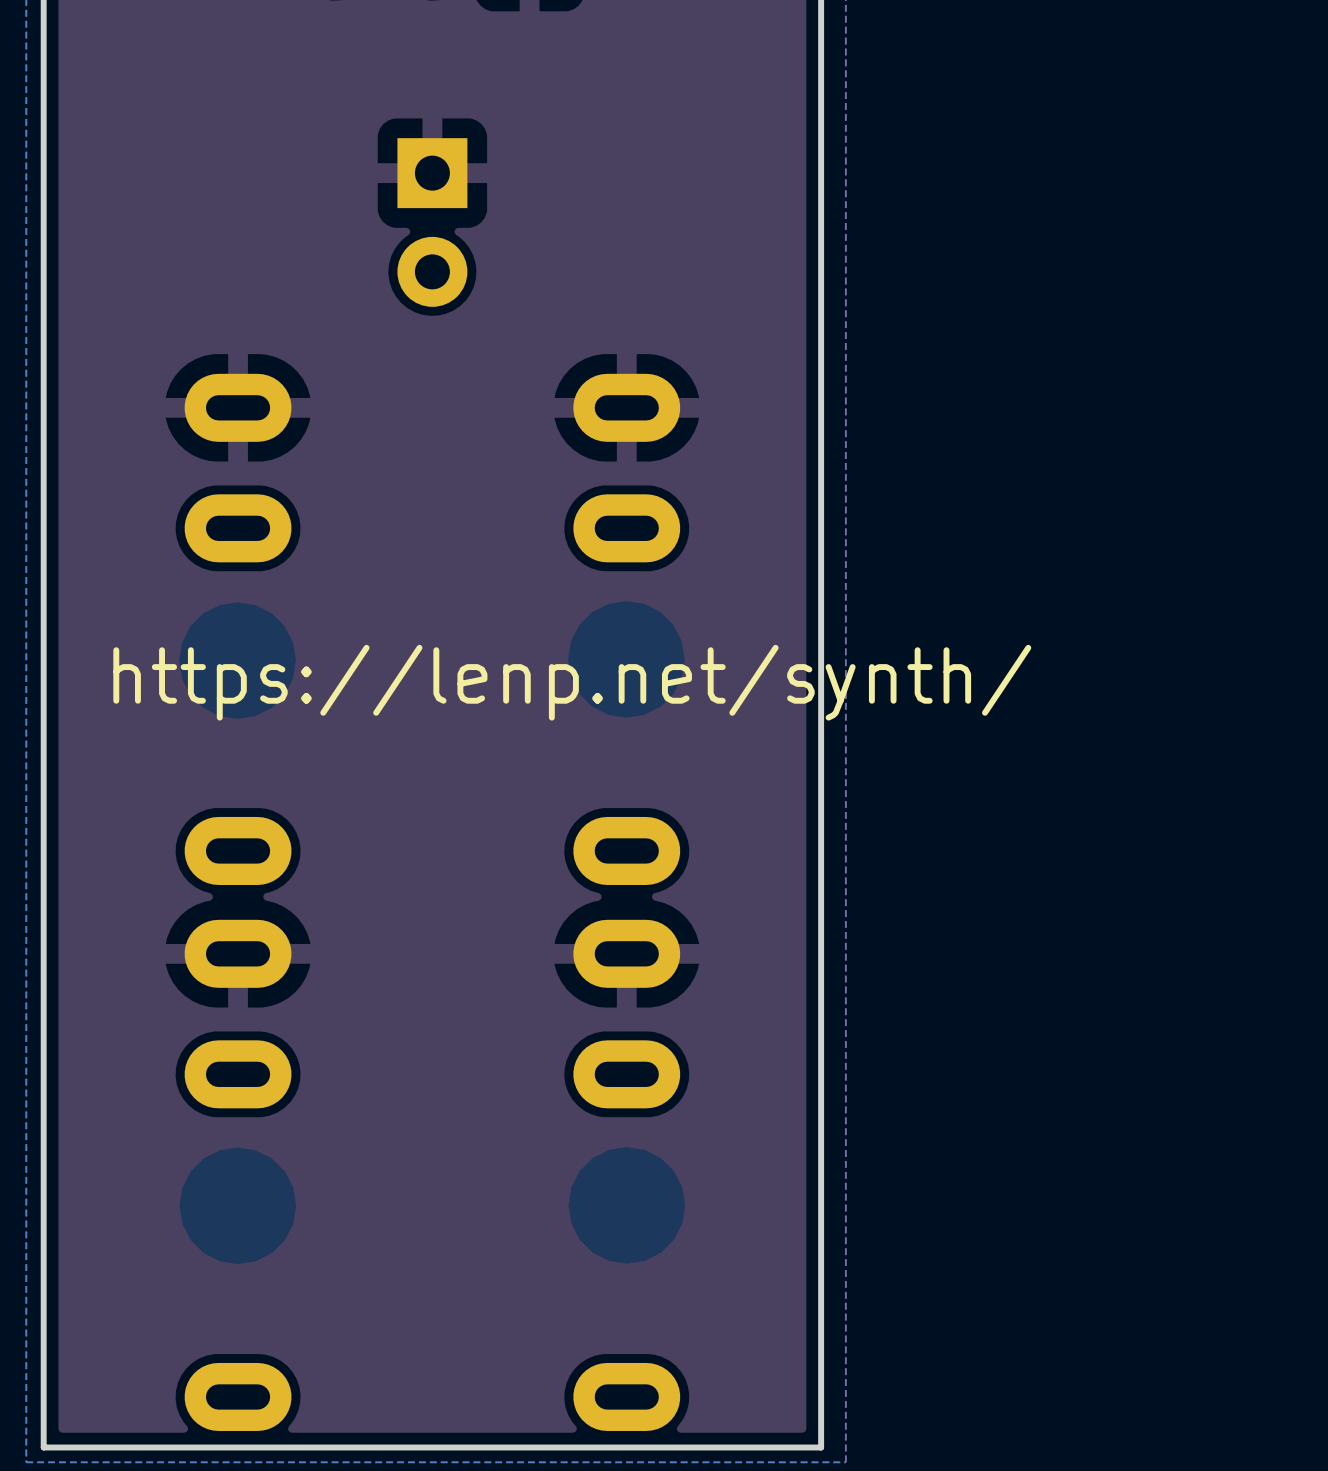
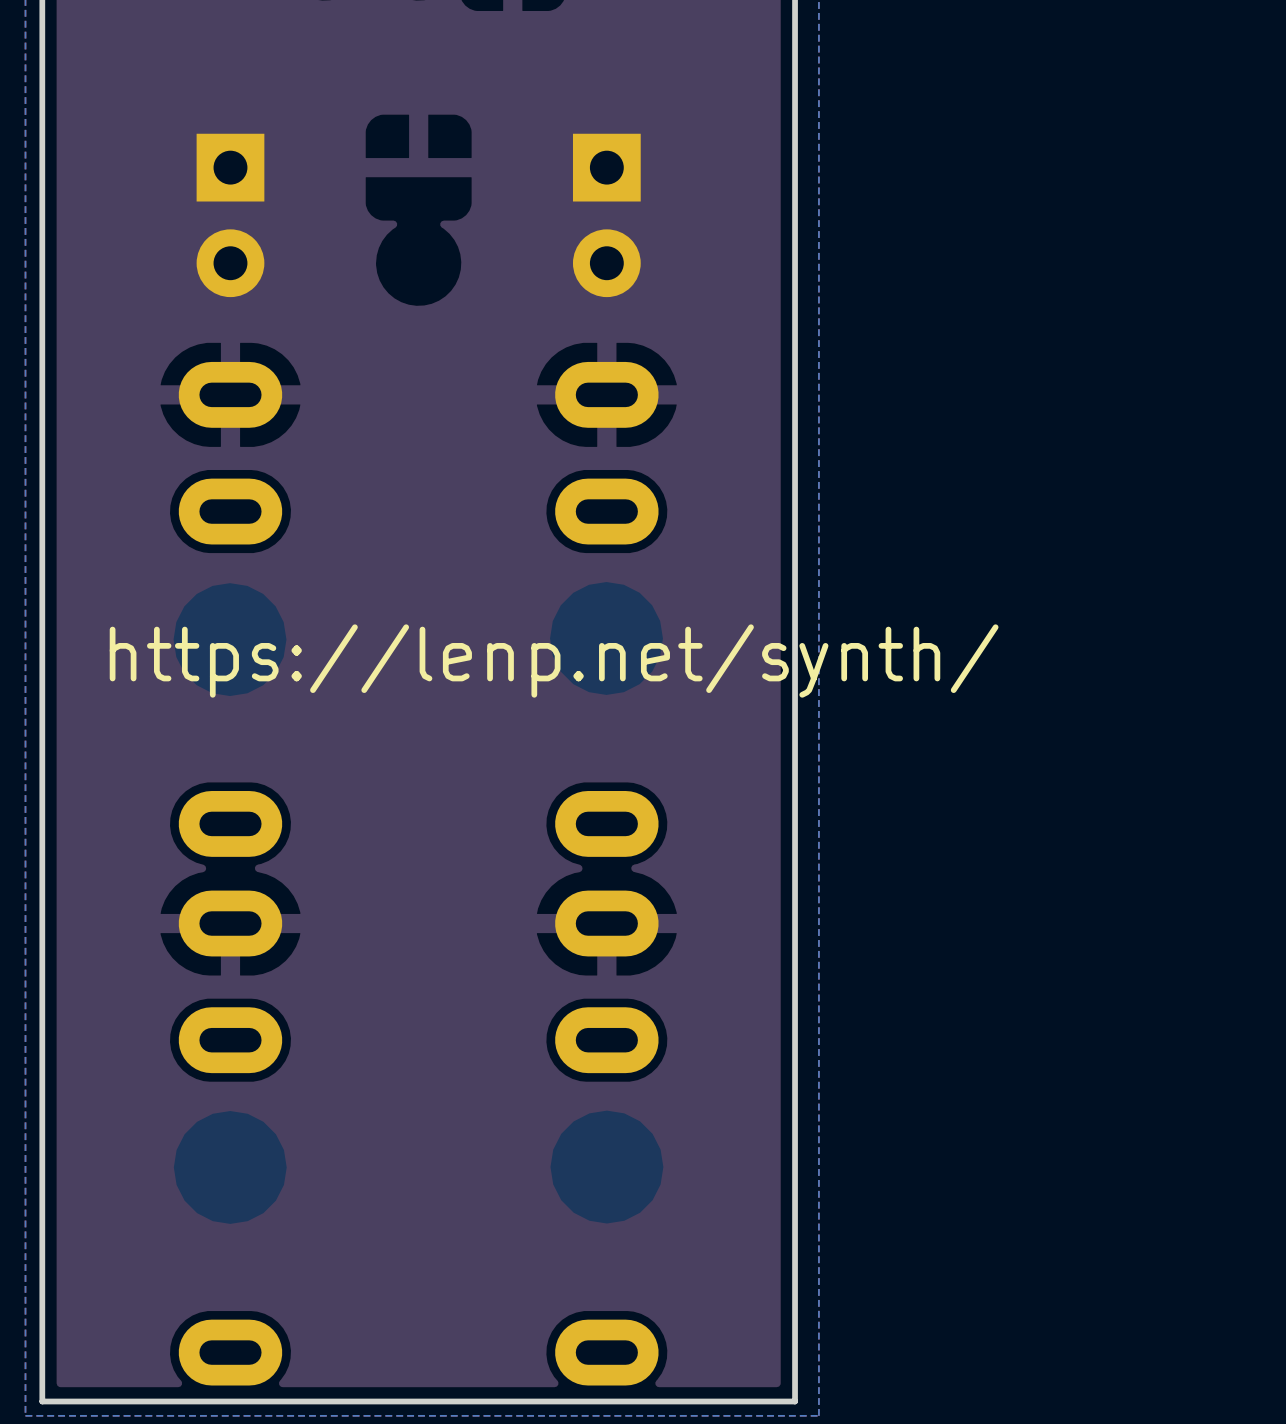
part: none -> (230, 215)
part: (432, 222) -> none
part: none -> (606, 215)

